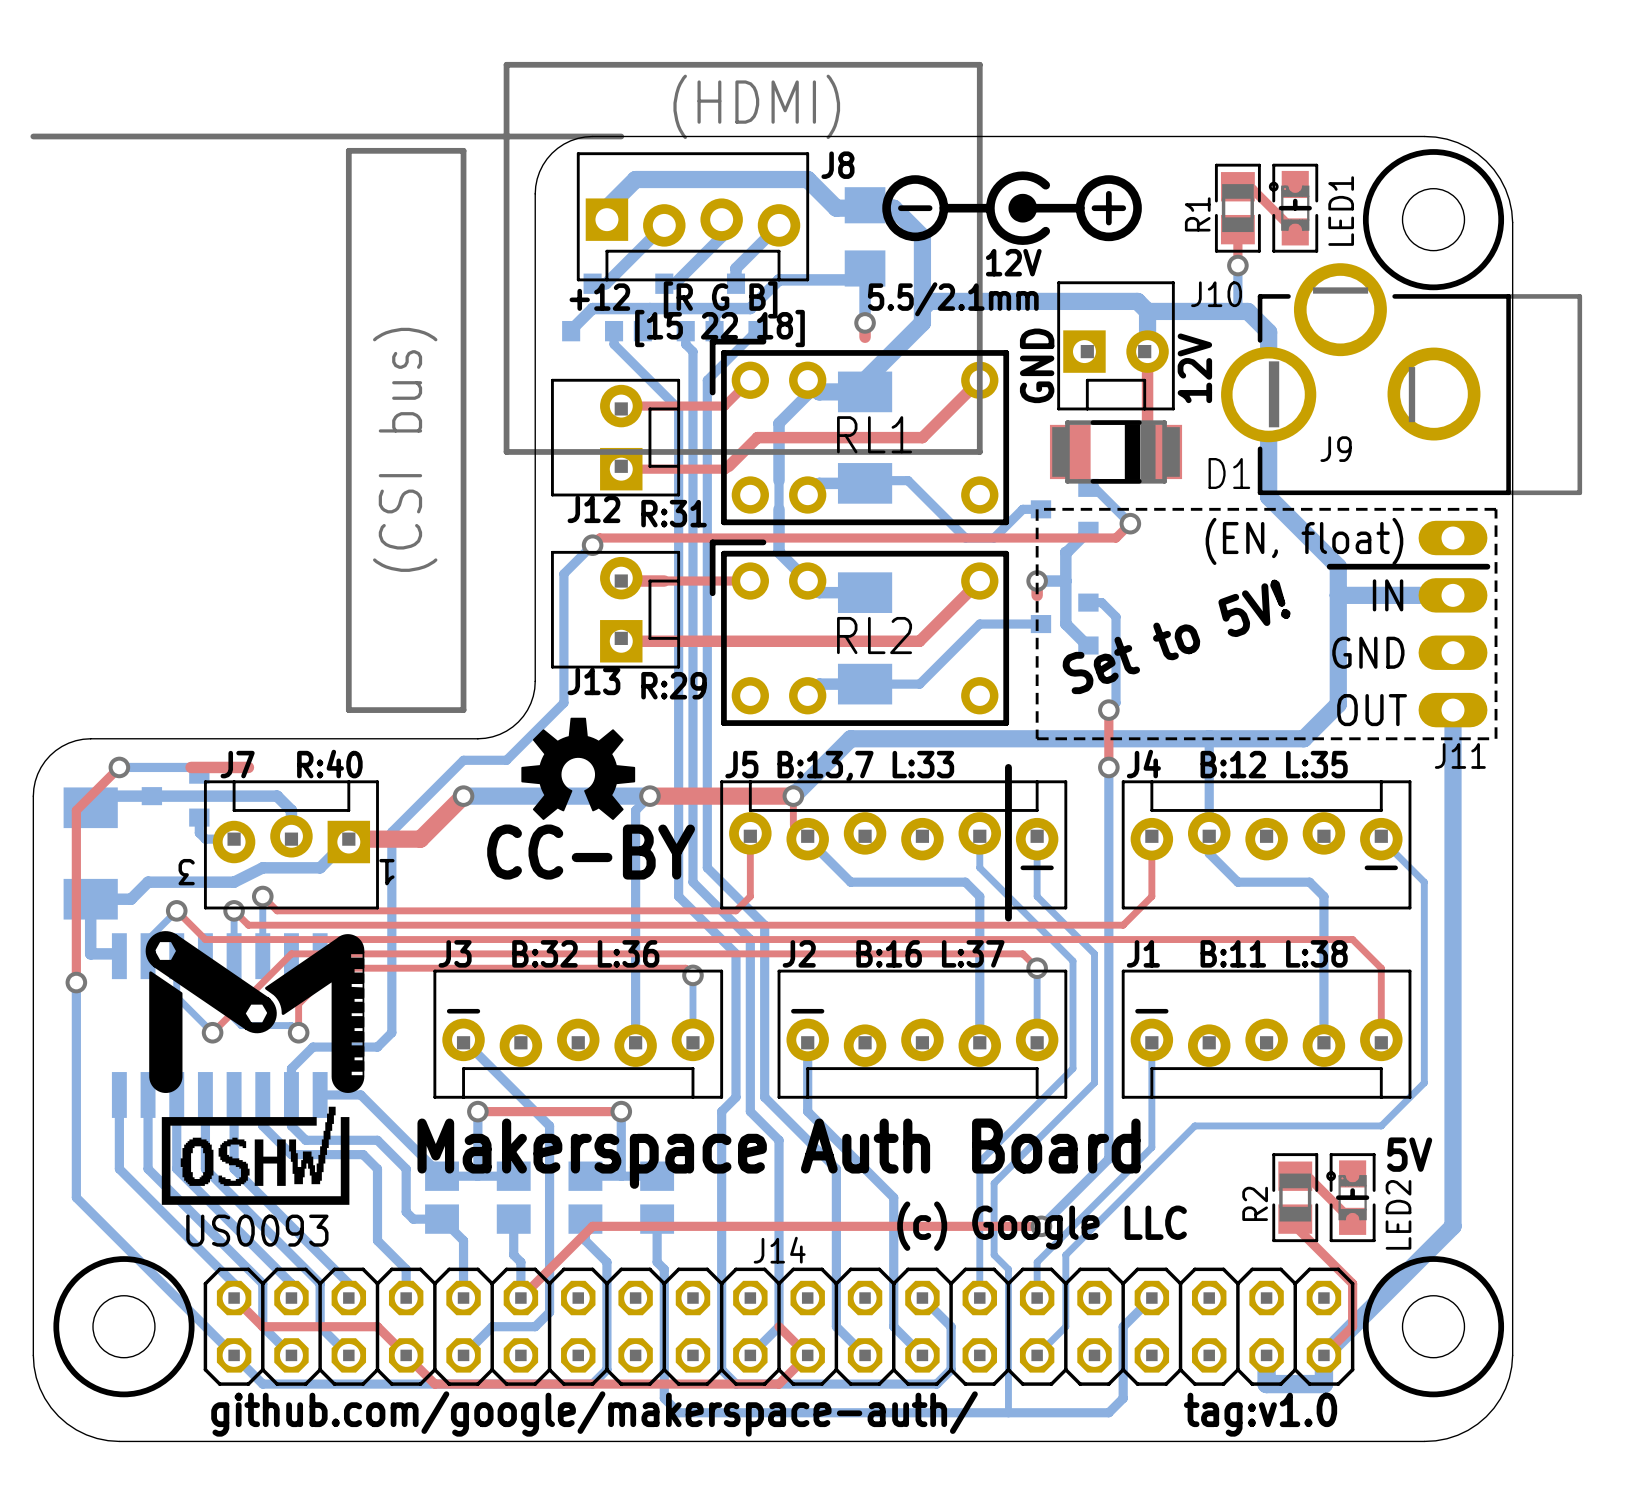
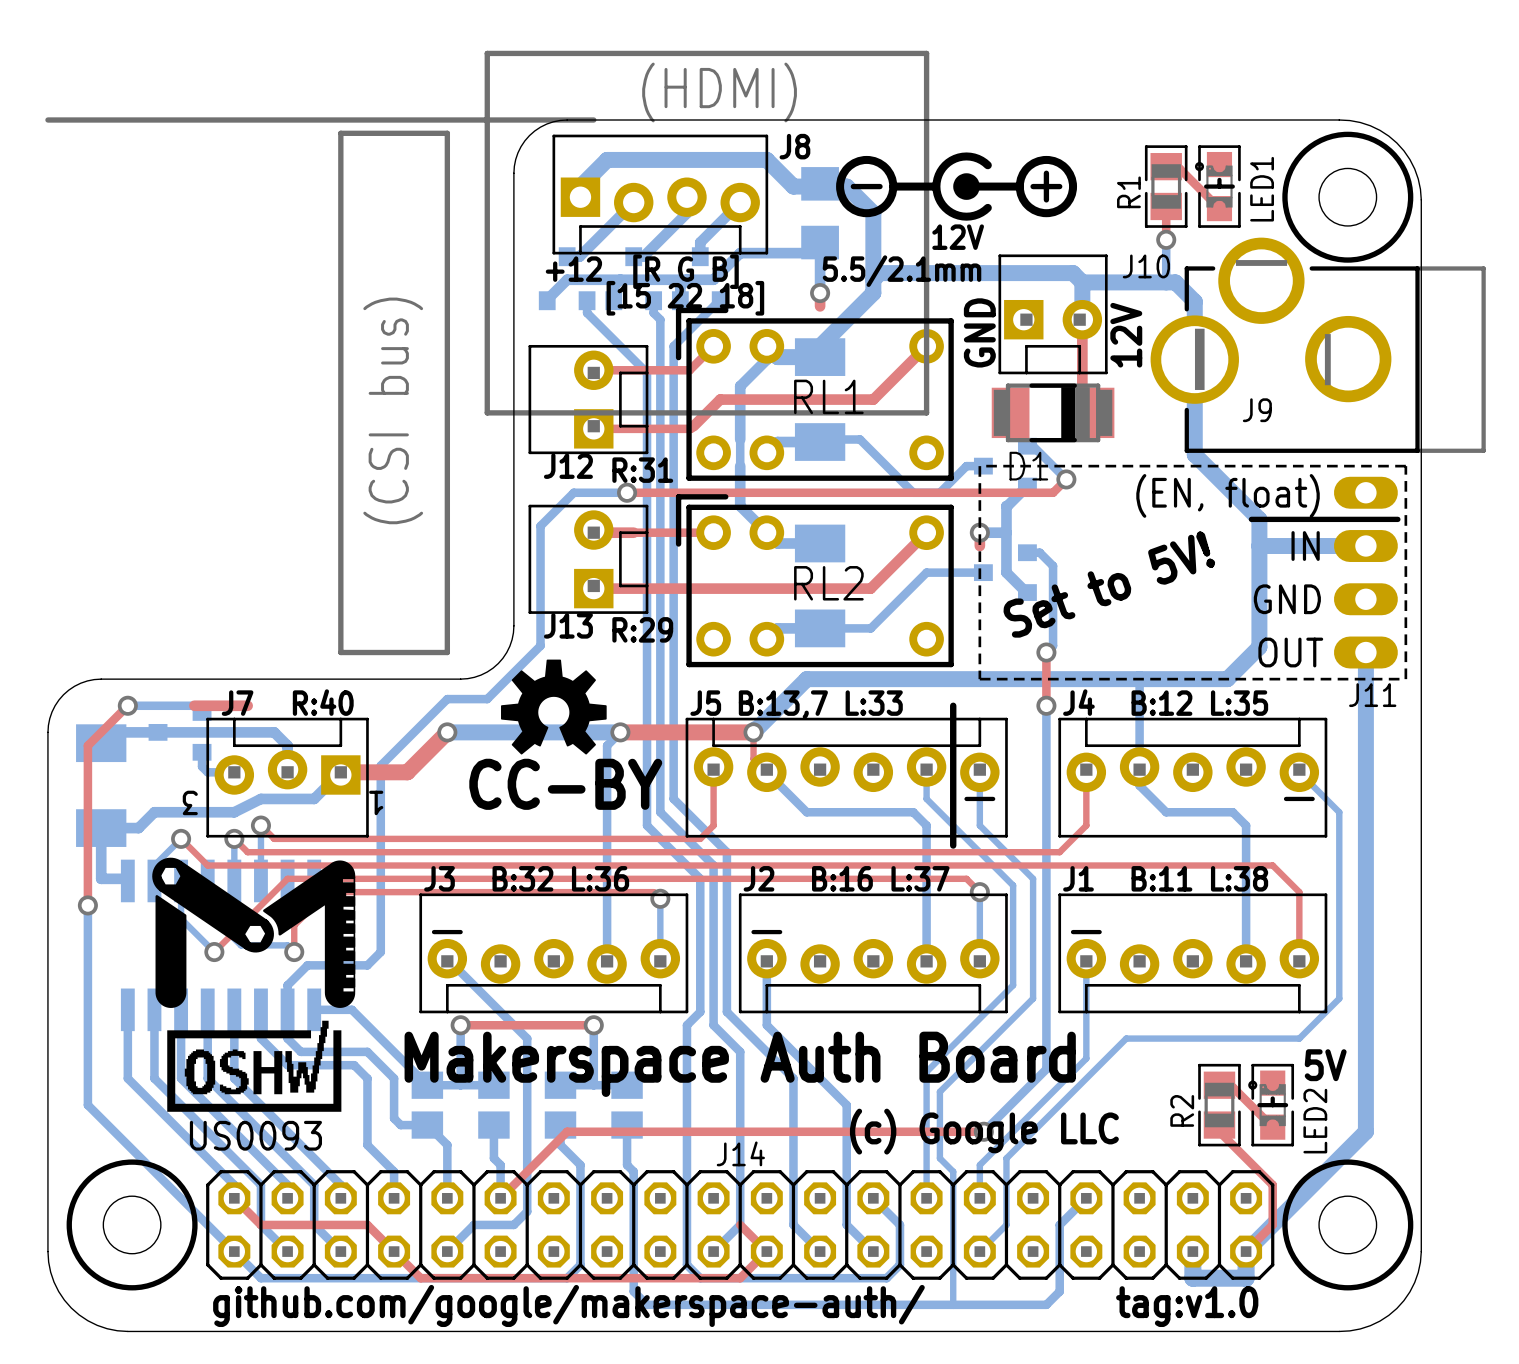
D1 name position: D1 (1229, 473) -> D1 (1028, 466)
top track: (657, 538) (599, 538) (592, 545) -> none
bottom track: none -> (627, 492) (573, 492) (567, 499)
via position: (592, 545) -> (627, 492)

